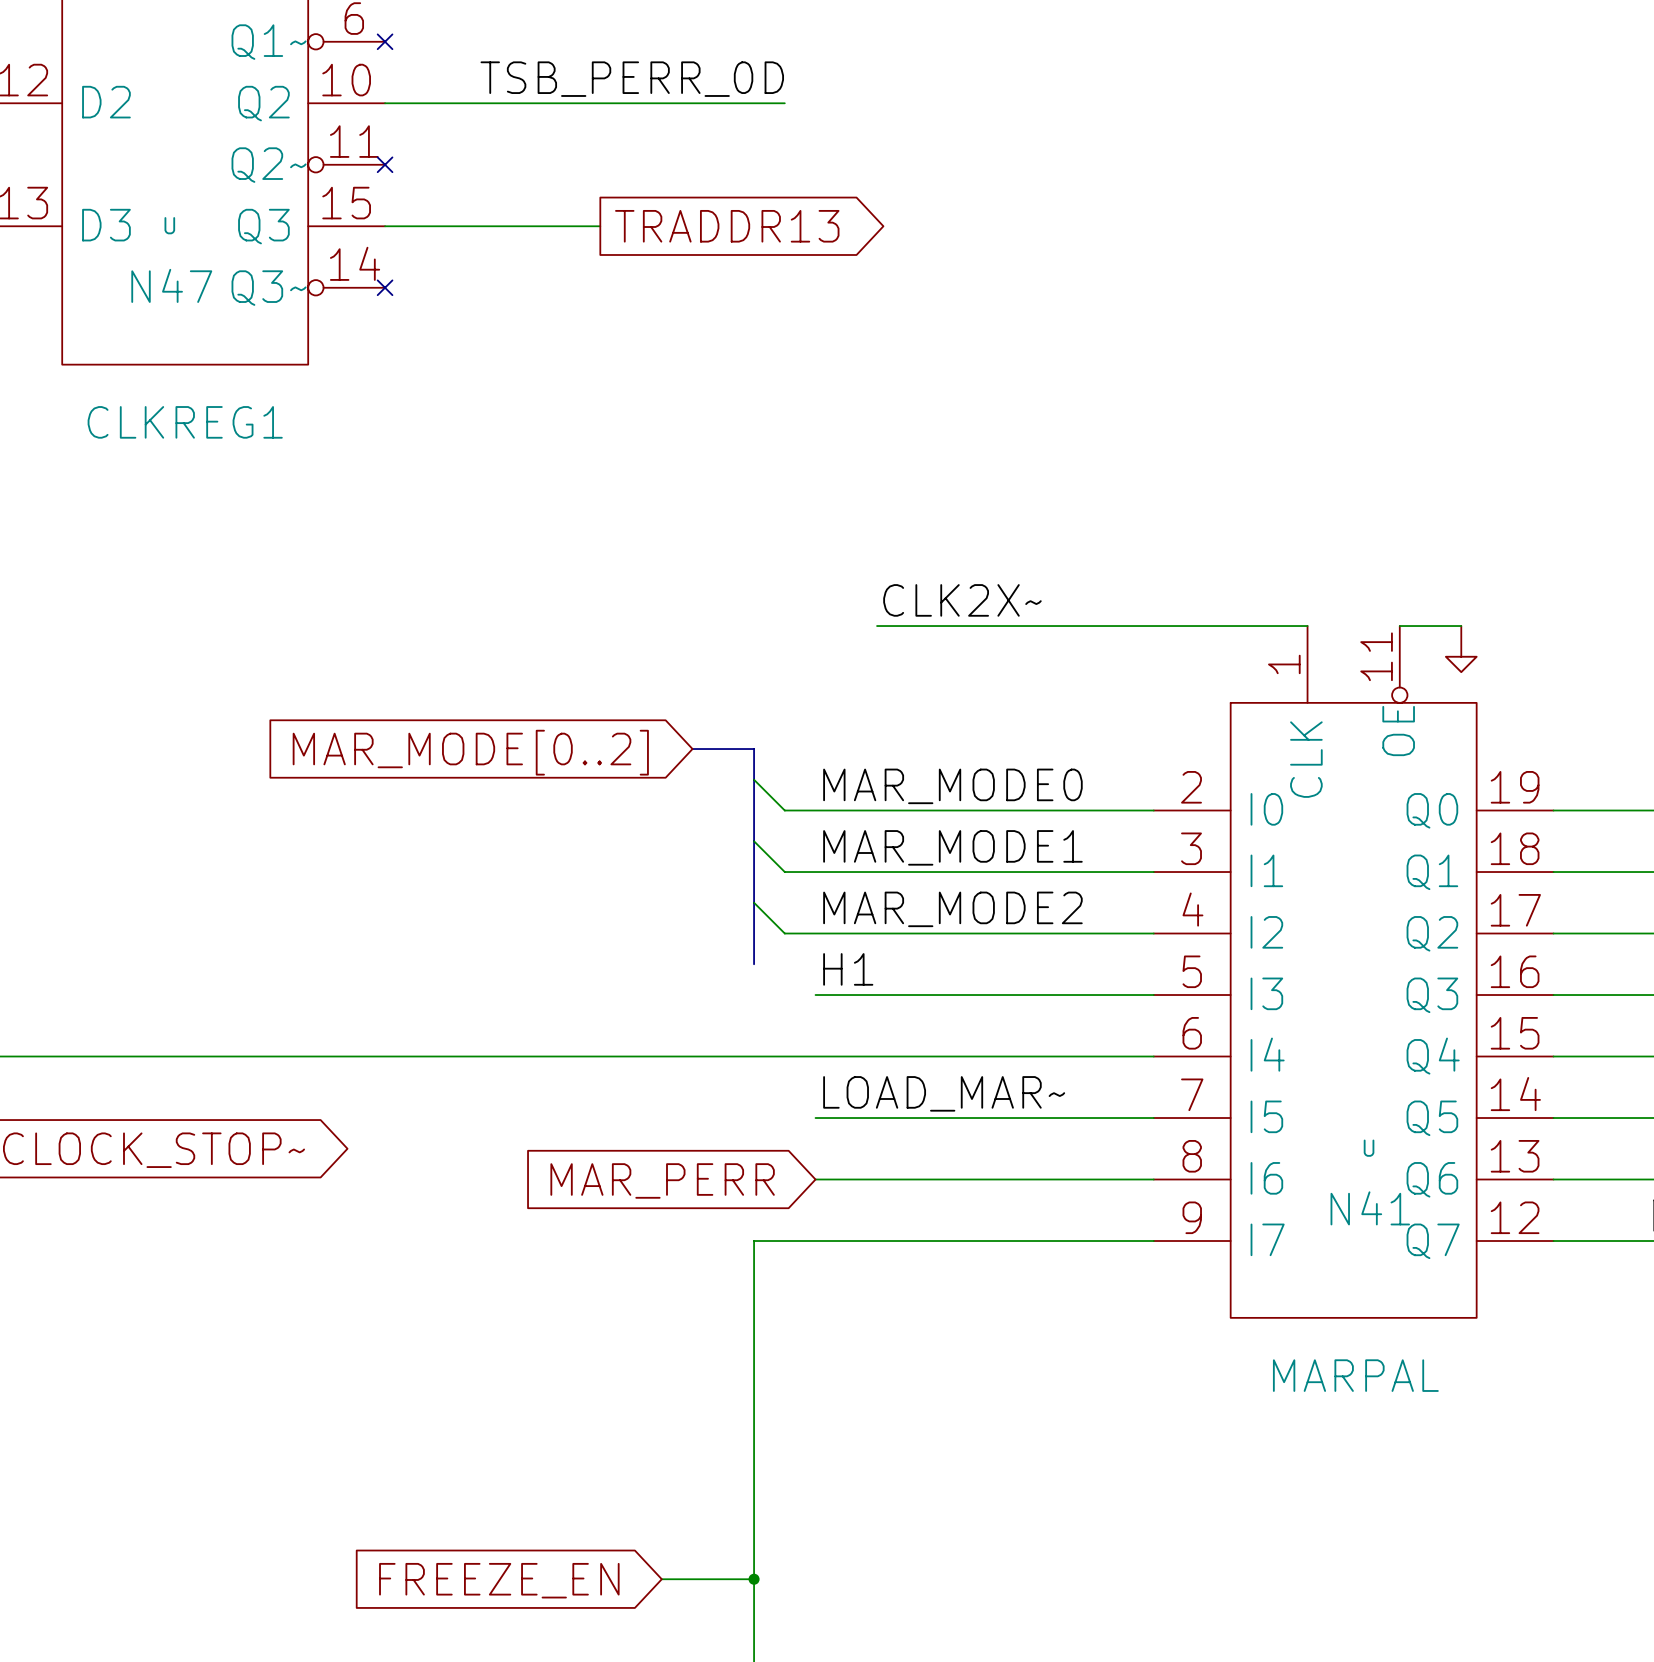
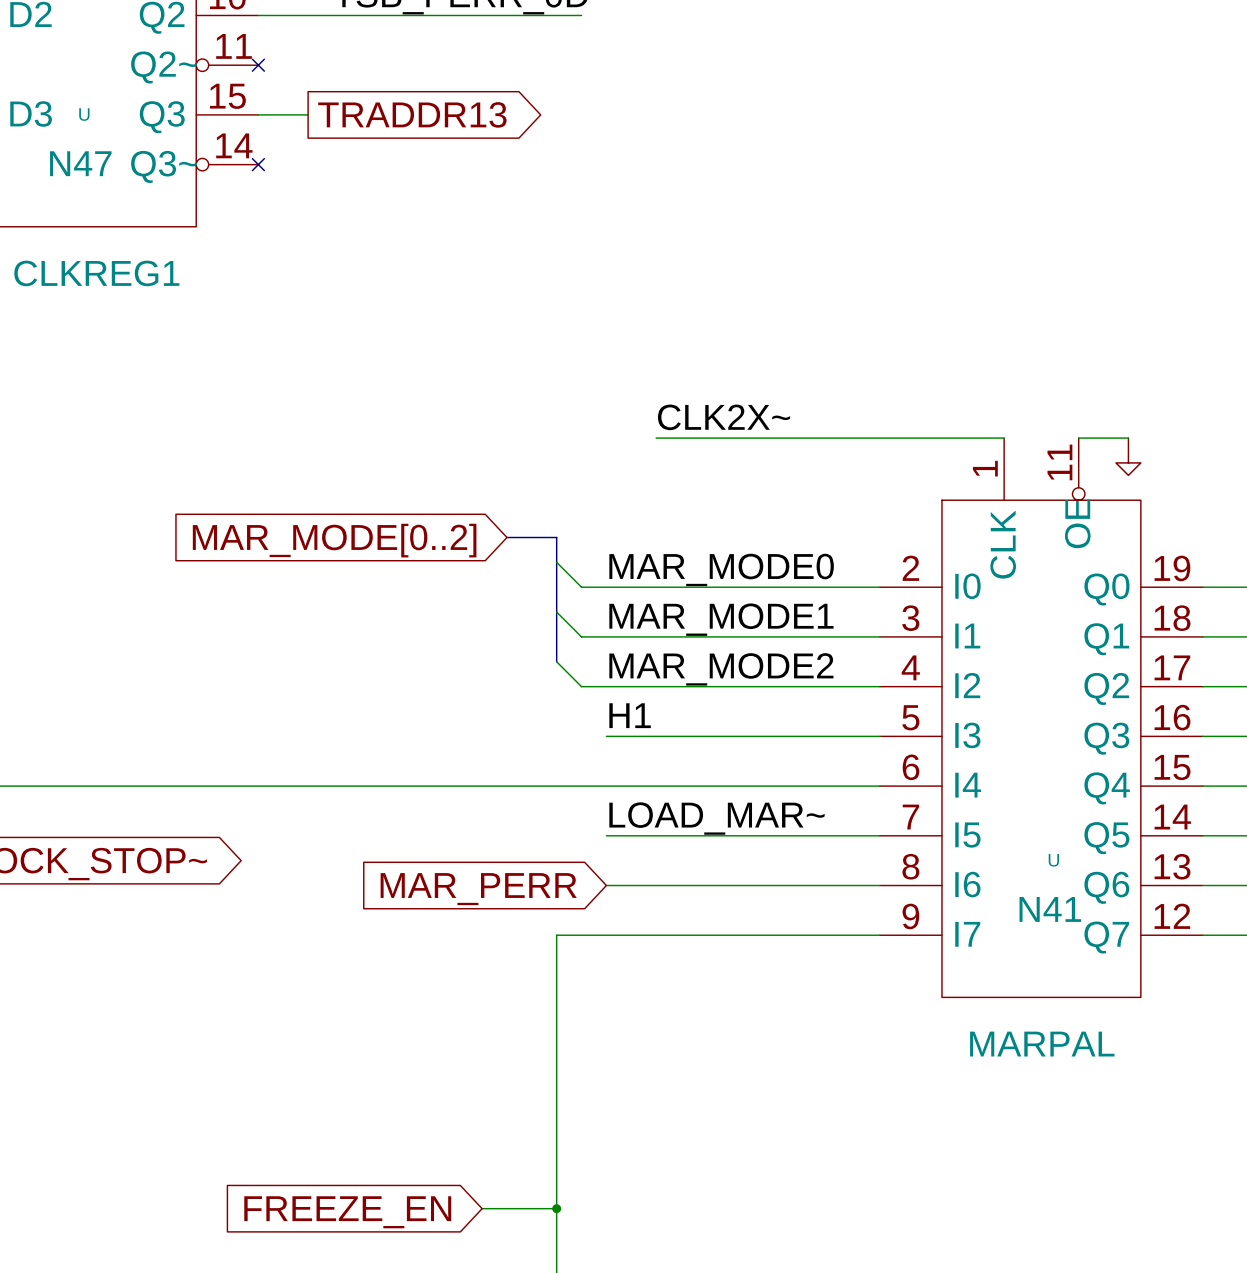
wire: (446, 226) (600, 226) -> none
global label position: TRADDR13 (727, 226) -> TRADDR13 (412, 114)
bus: (754, 902) (754, 964) -> none

